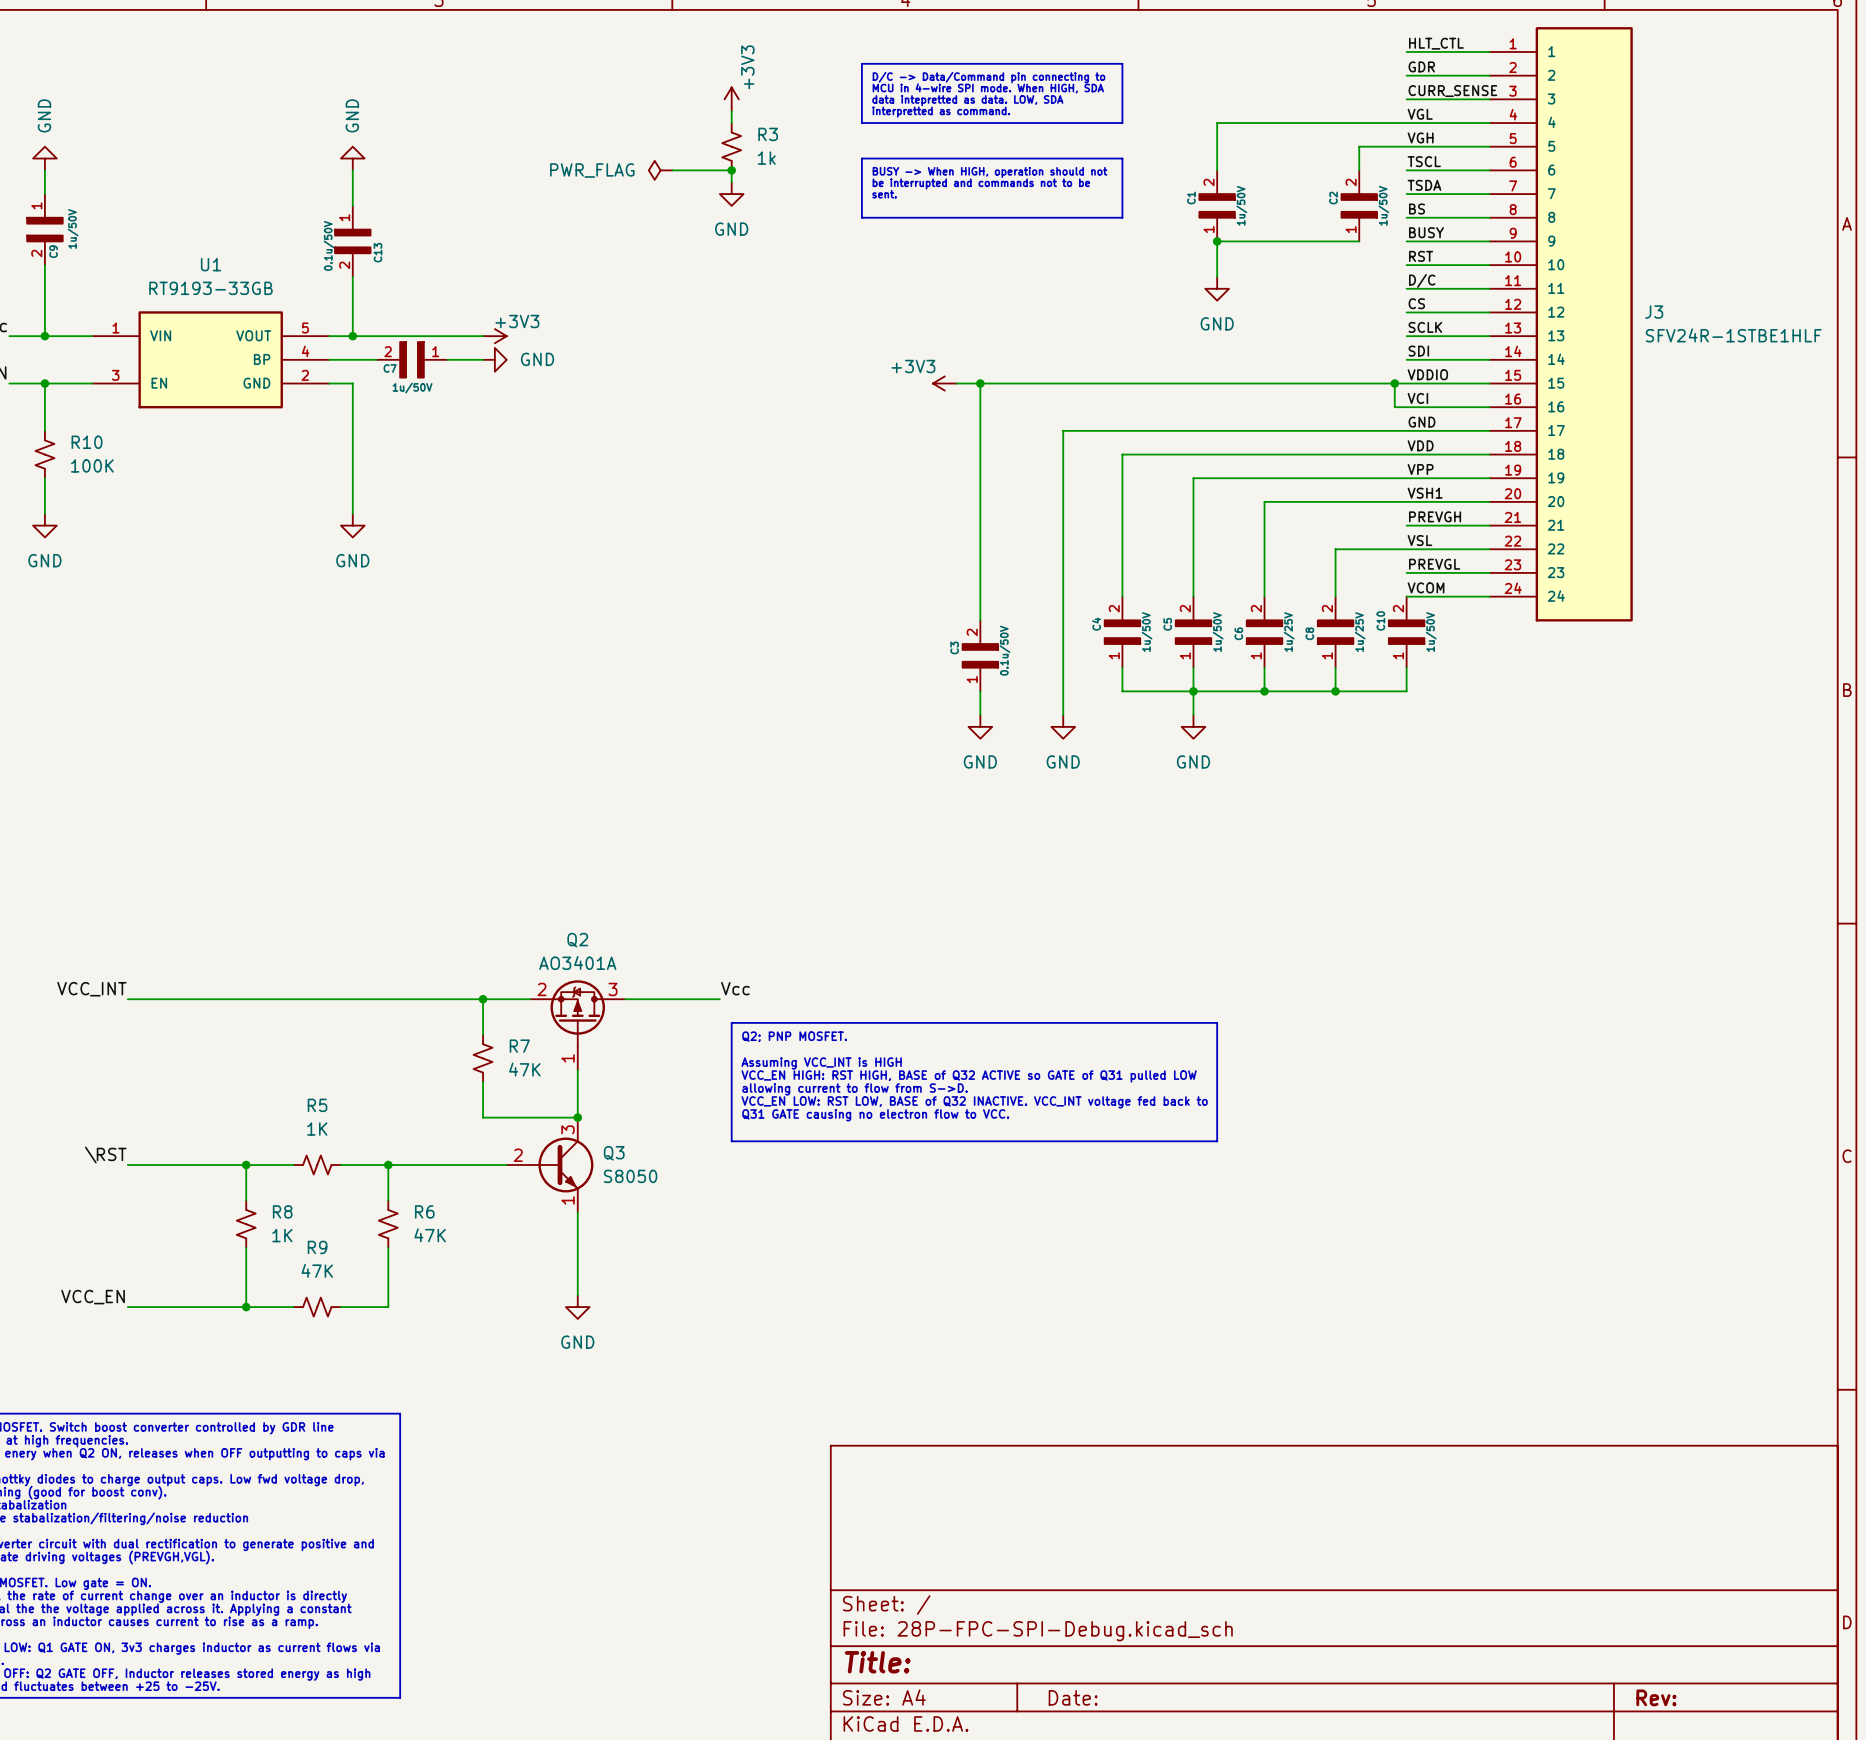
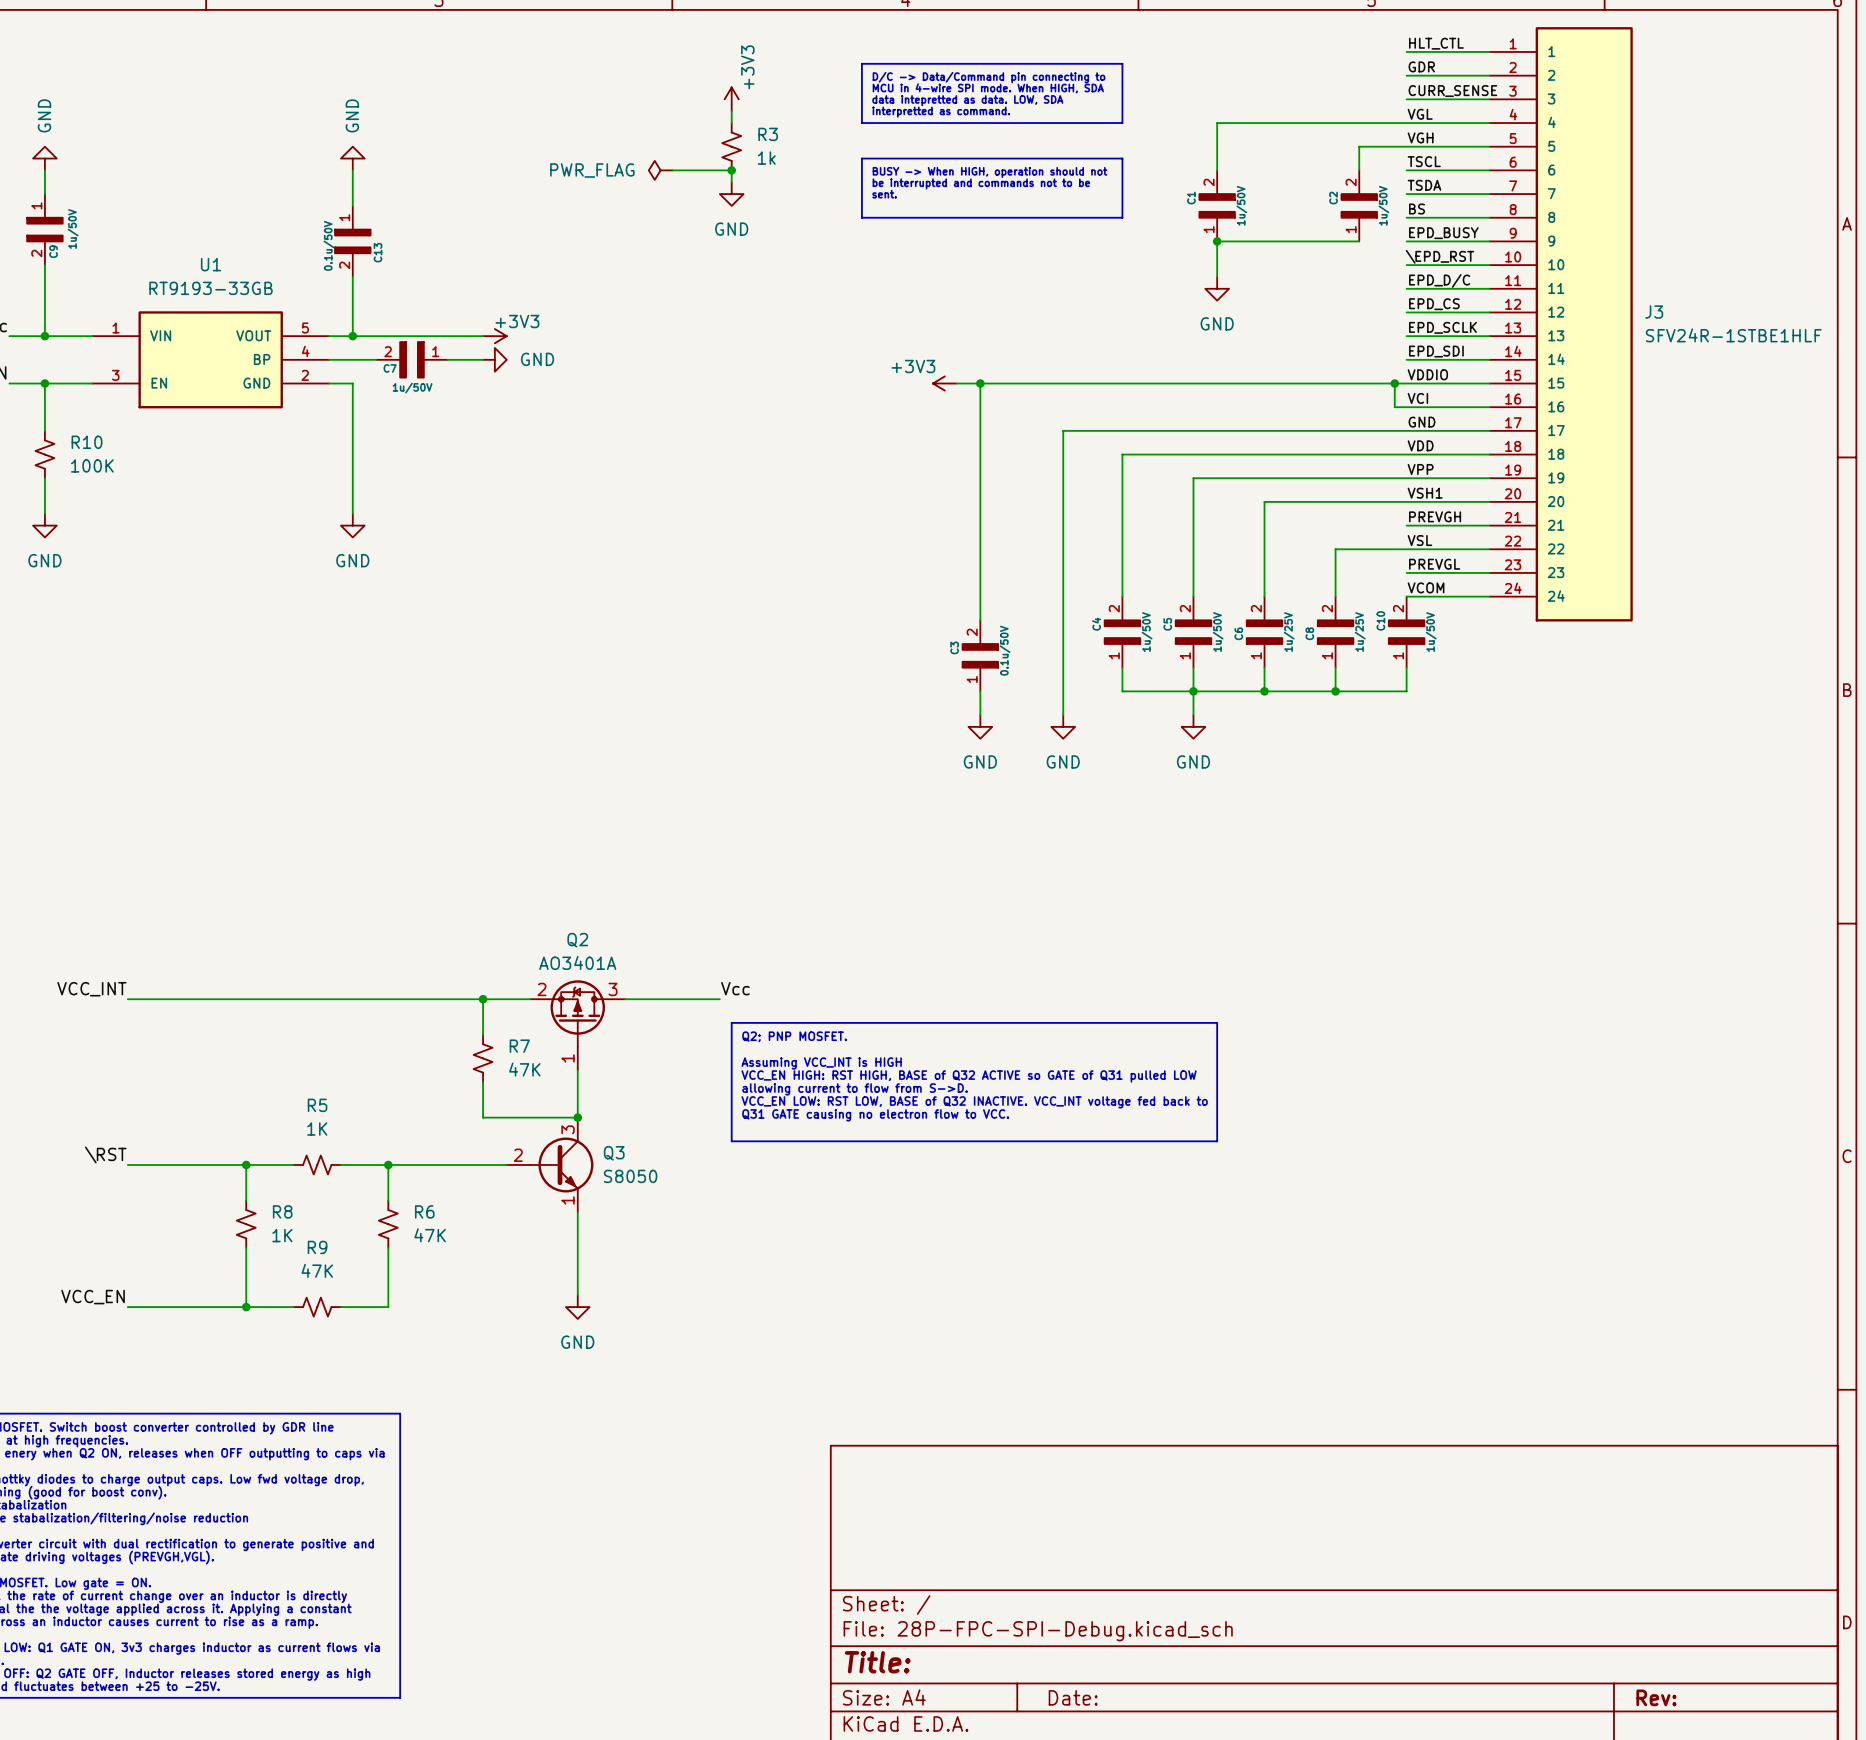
label: BUSY (1426, 232) -> EPD_BUSY (1443, 233)
label: RST (1421, 256) -> \EPD_RST (1440, 256)
label: D/C (1422, 280) -> EPD_D/C (1439, 280)
label: CS (1416, 303) -> EPD_CS (1434, 304)
label: SCLK (1425, 327) -> EPD_SCLK (1442, 327)
label: SDI (1418, 351) -> EPD_SDI (1436, 351)

